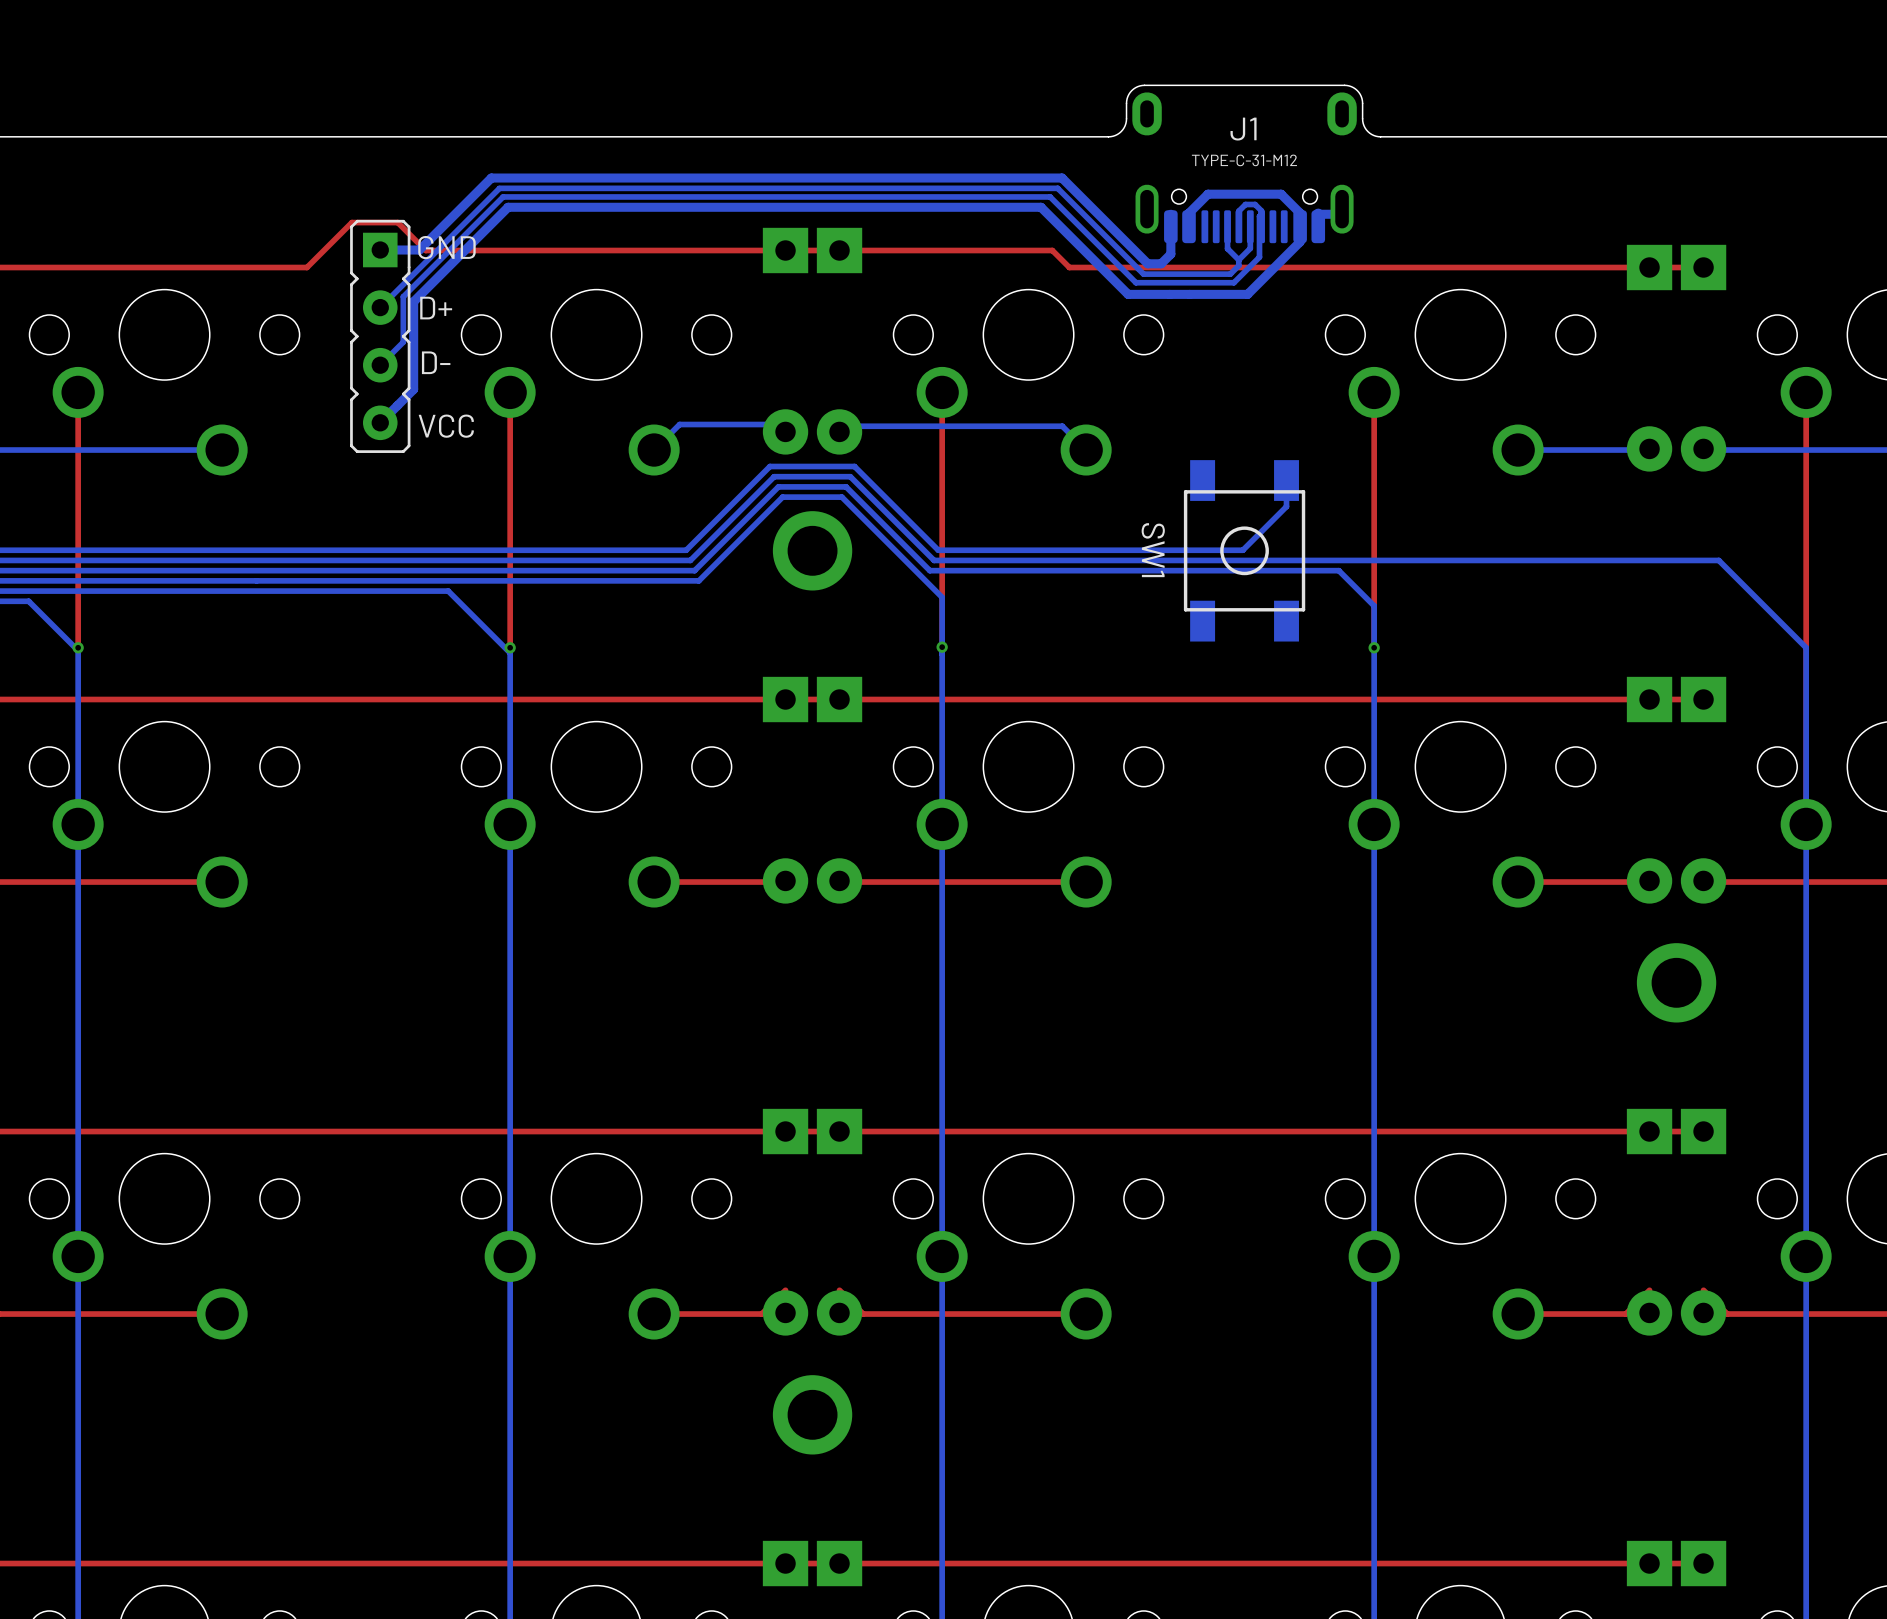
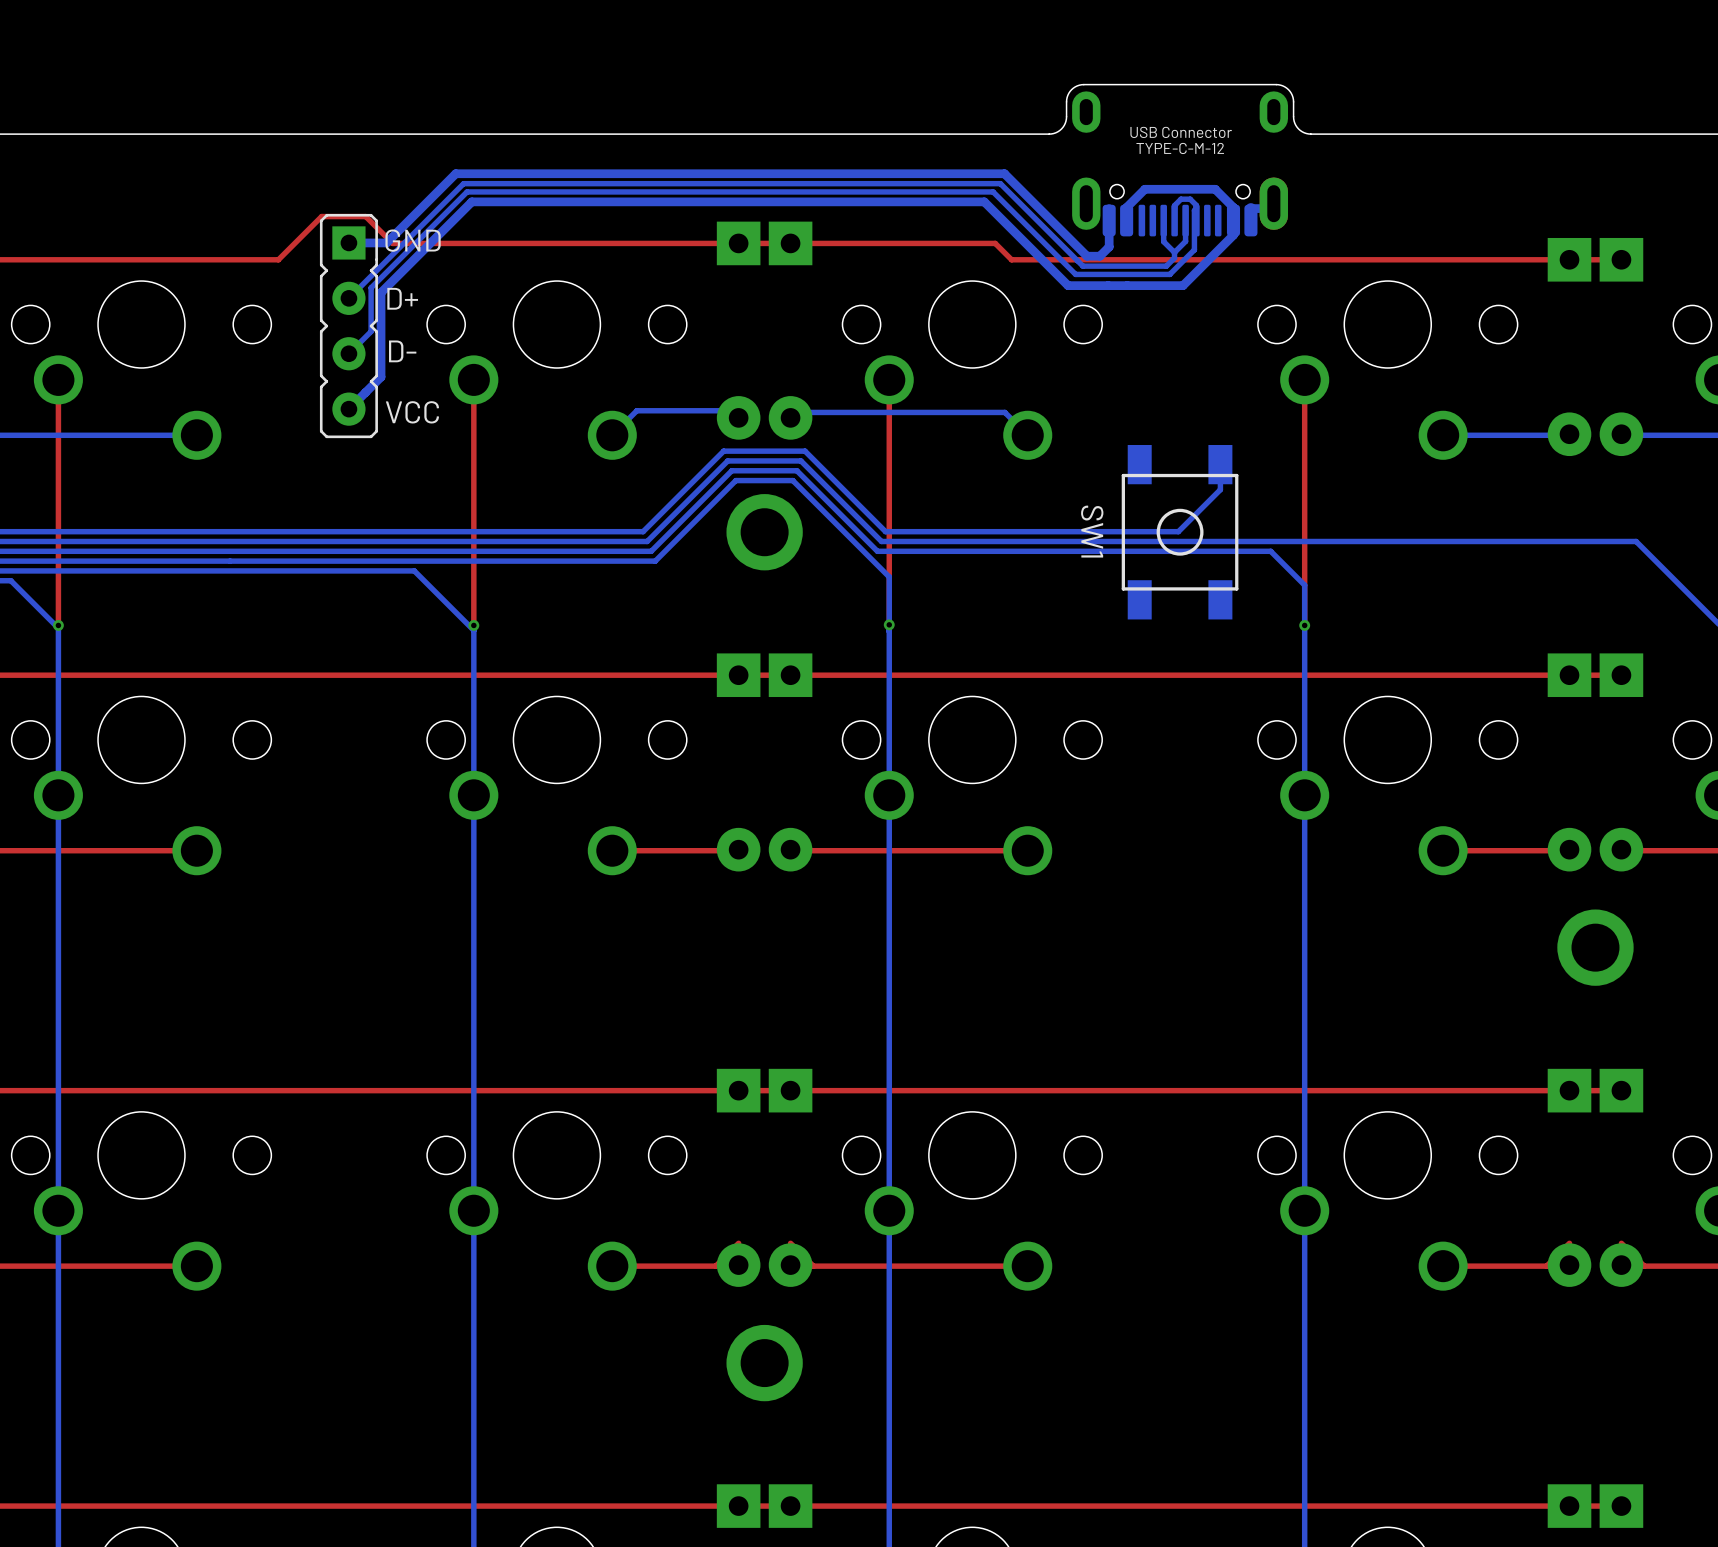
text: TYPE-C-31-M12 (1244, 160) -> none
J1: (1244, 167) -> none
part: none -> (1180, 163)

